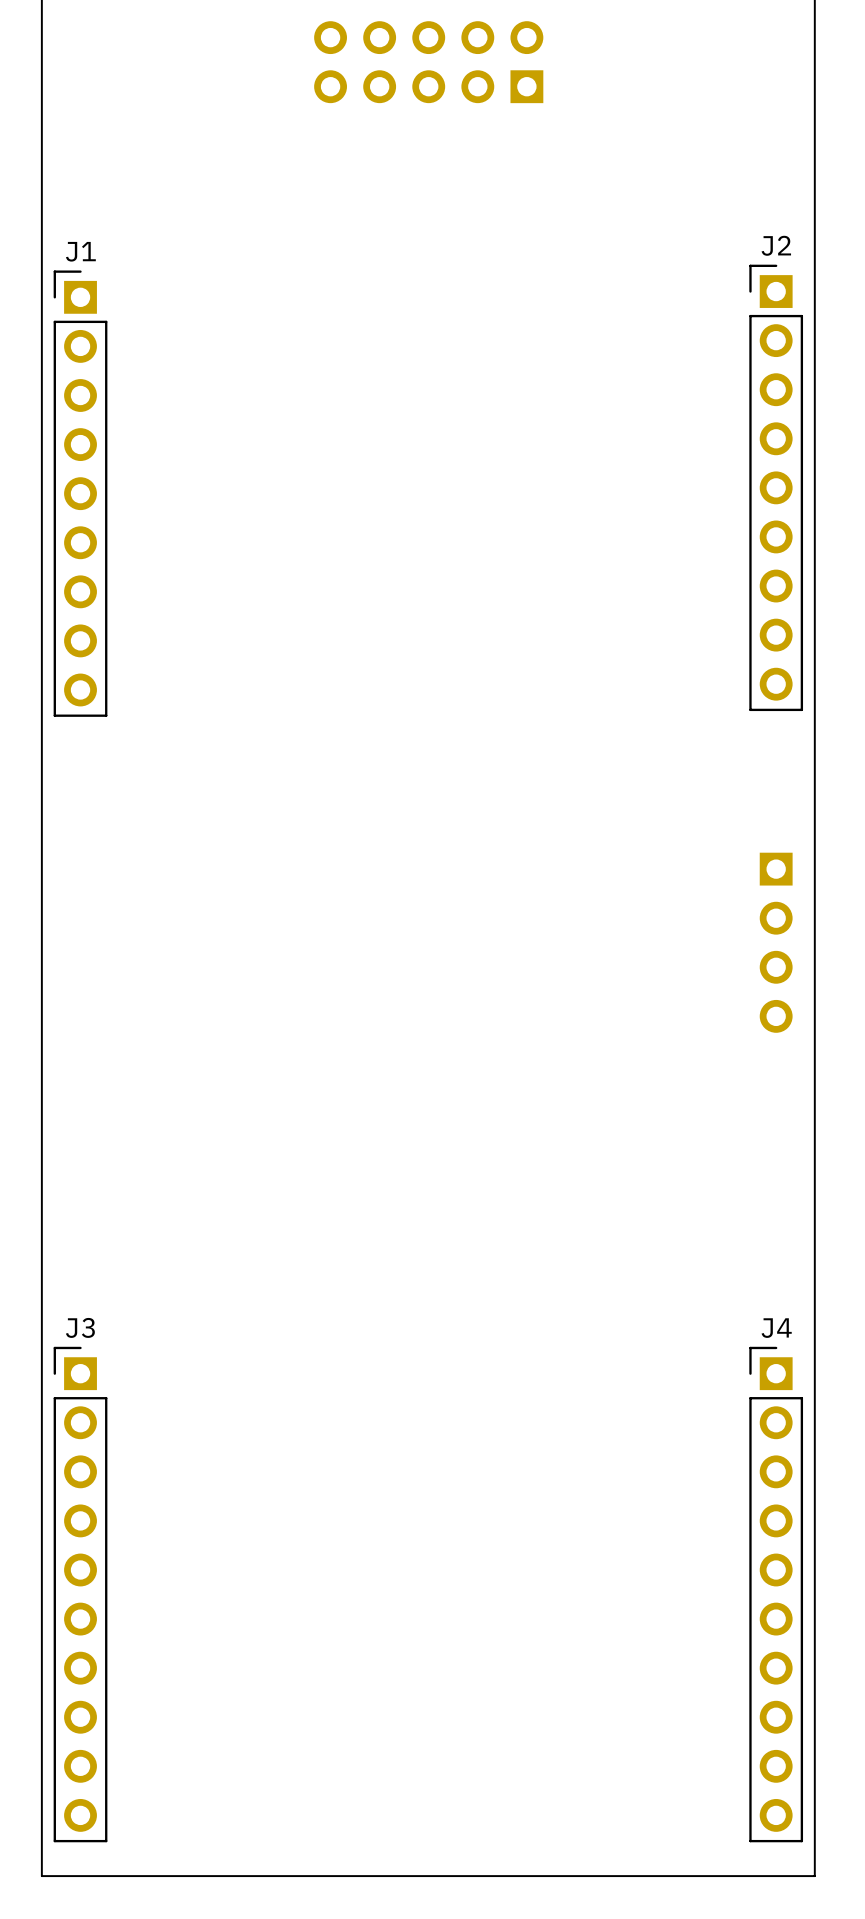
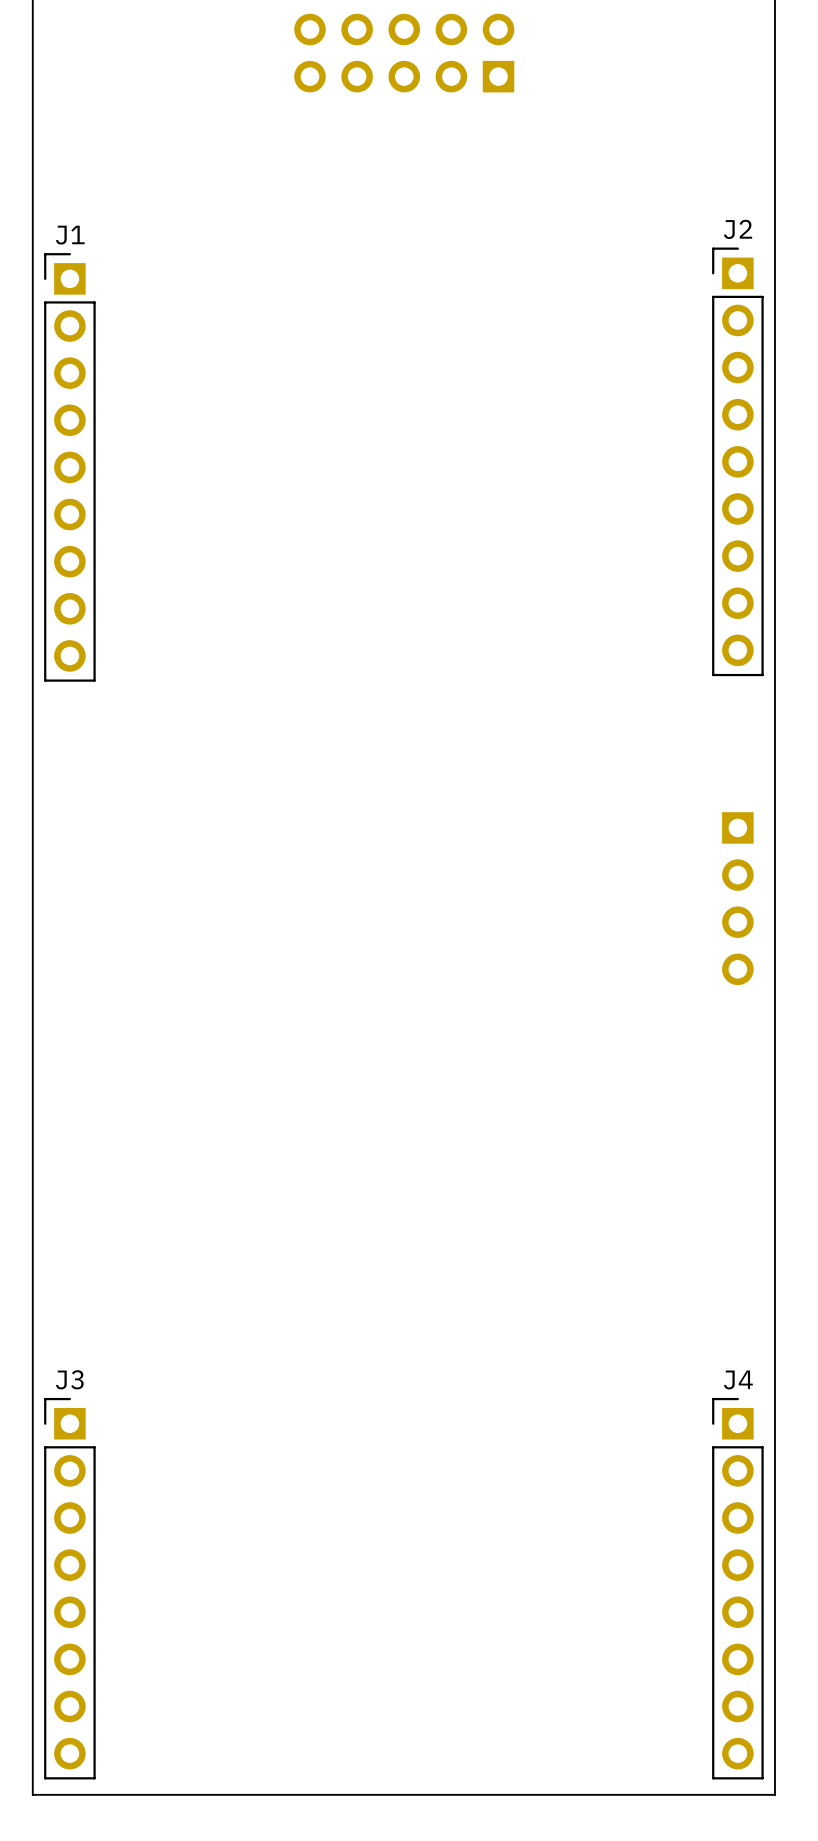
J3 name position: J3 (80, 1327) -> J3 (69, 1379)
J4 name position: J4 (776, 1328) -> J4 (738, 1379)
J3 footprint: [53, 1346, 108, 1843] -> [44, 1397, 96, 1780]
J4 footprint: [749, 1346, 804, 1843] -> [712, 1397, 764, 1780]

